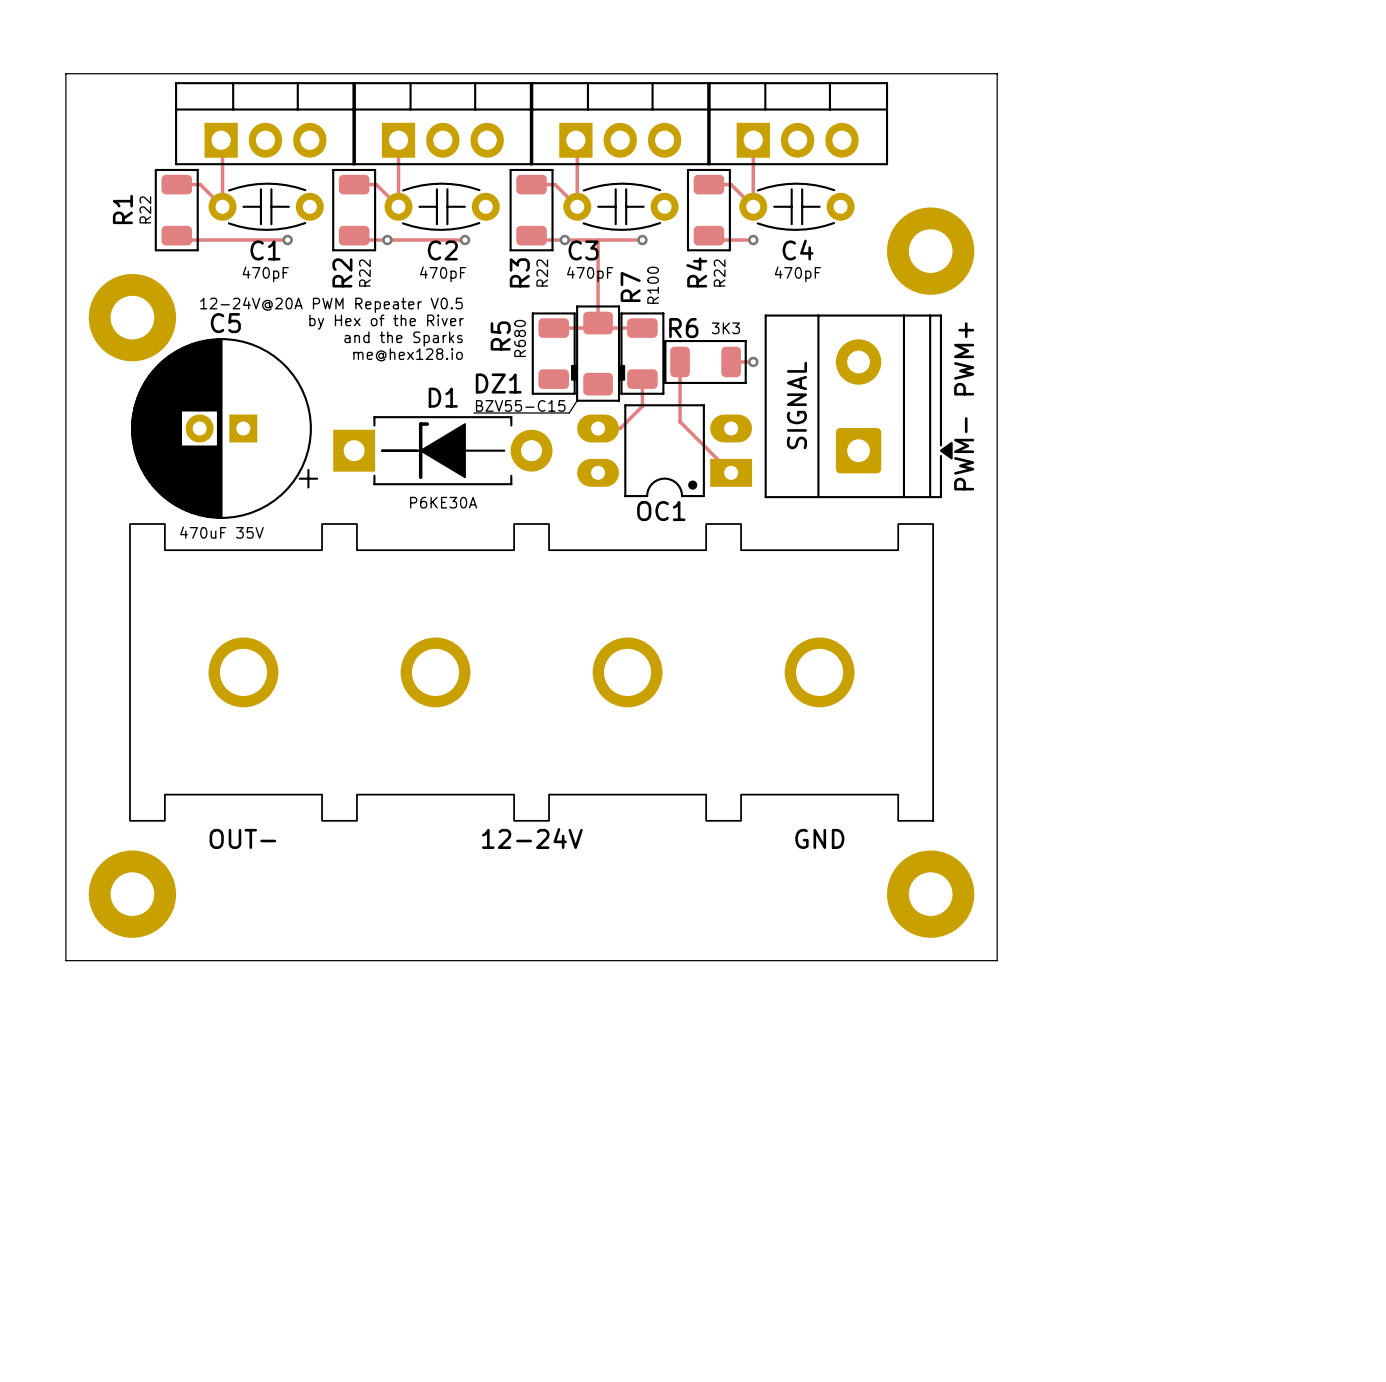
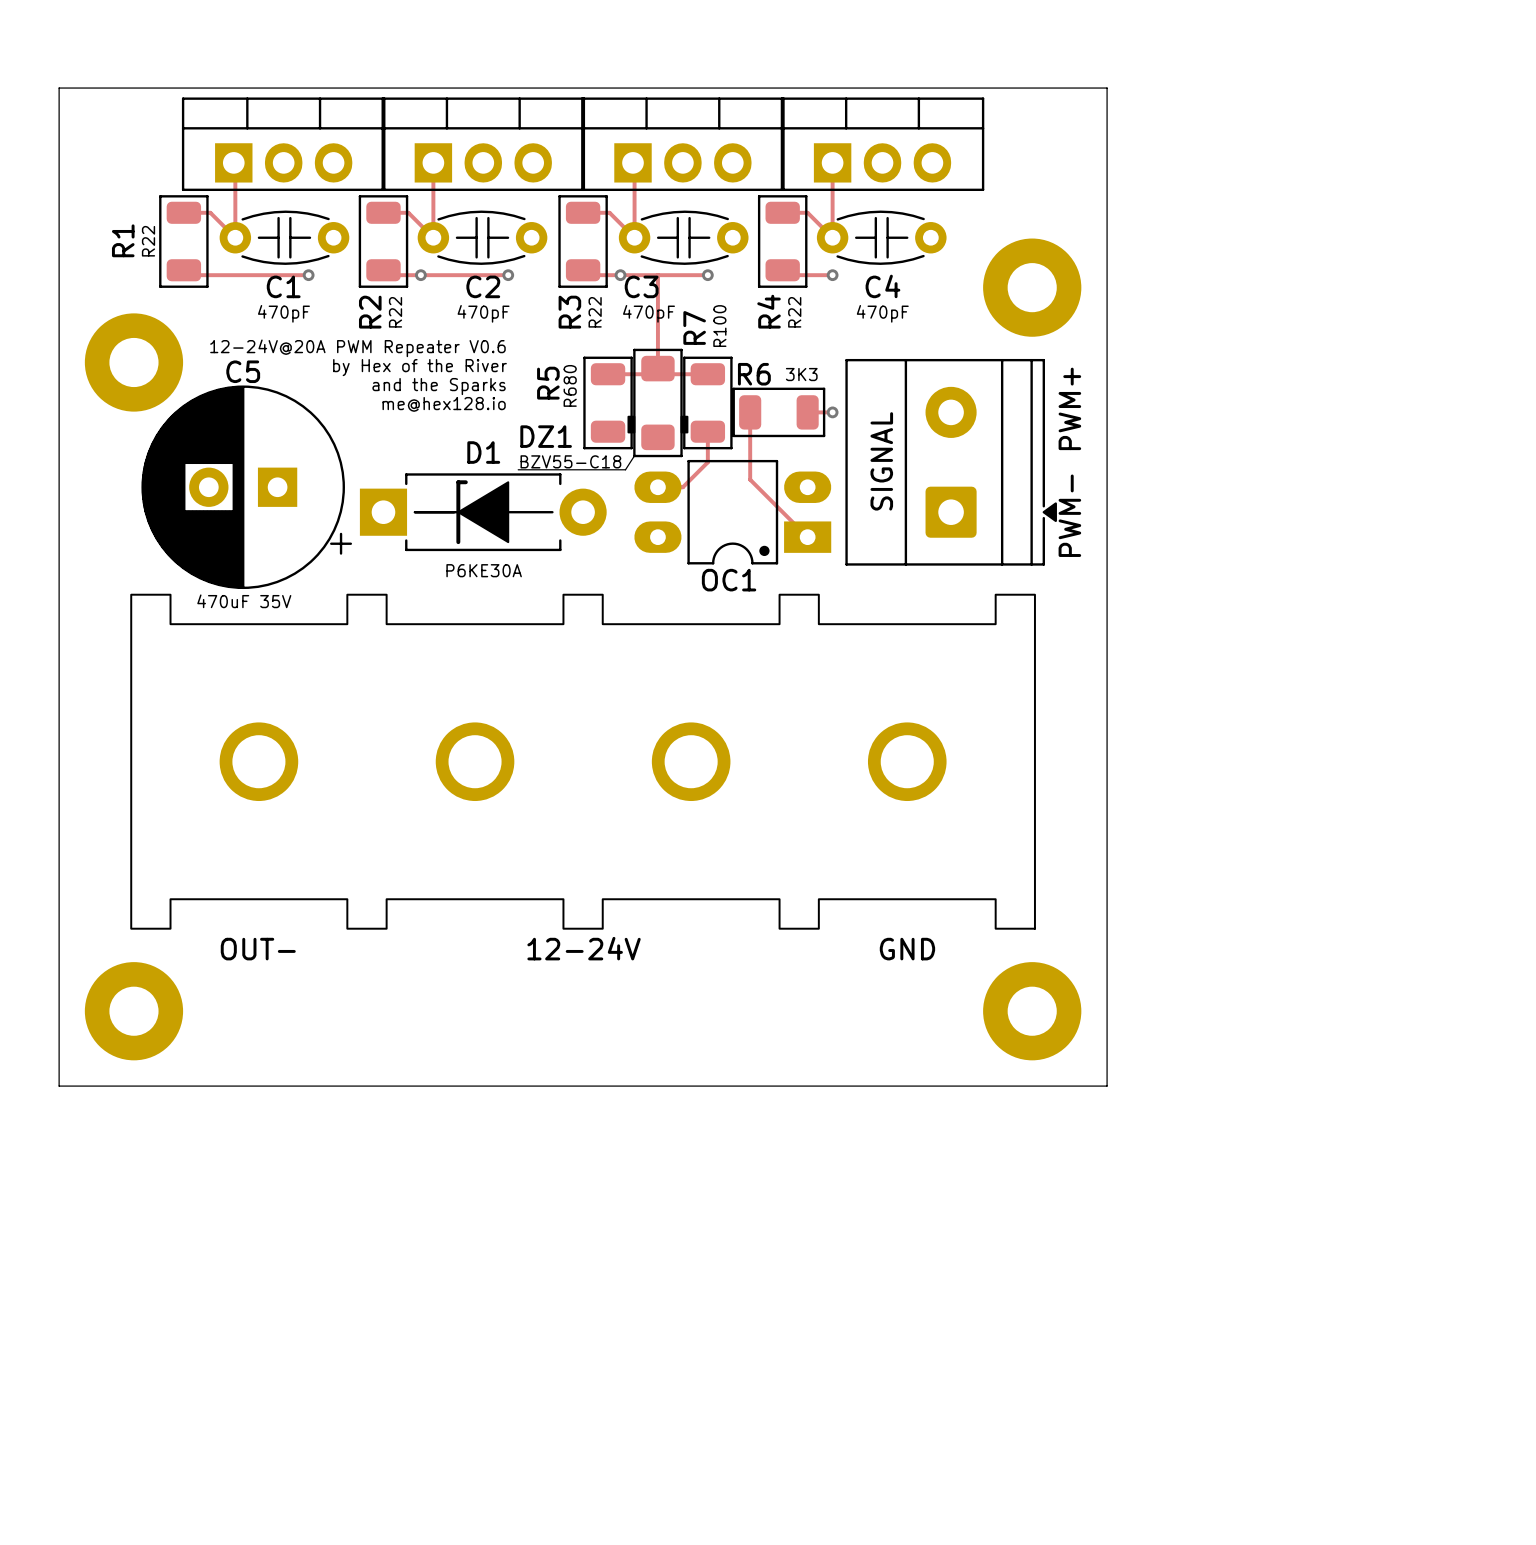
text: 12-24V@20A PWM Repeater V0.5 (331, 305) -> 12-24V@20A PWM Repeater V0.6 (357, 348)
C5 footprint: [131, 338, 319, 519] -> [141, 385, 353, 590]
DZ1 value: BZV55-C15 (520, 405) -> BZV55-C18 (570, 461)

